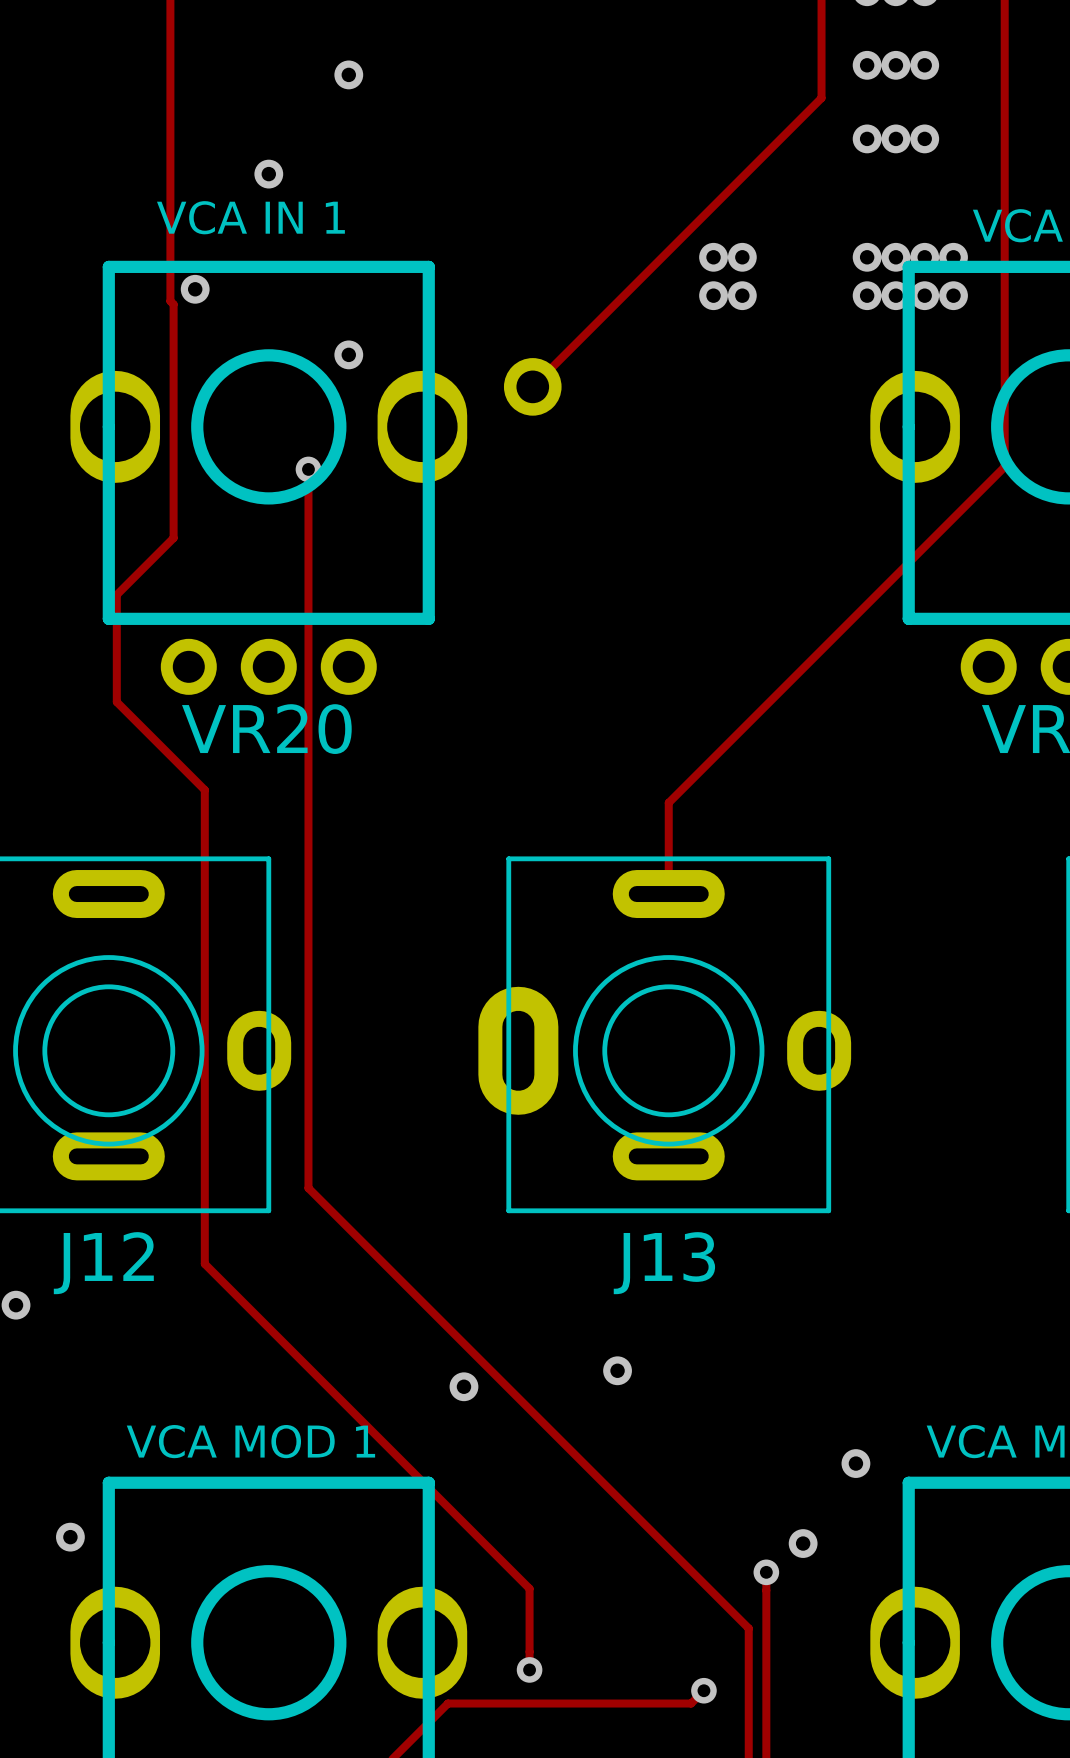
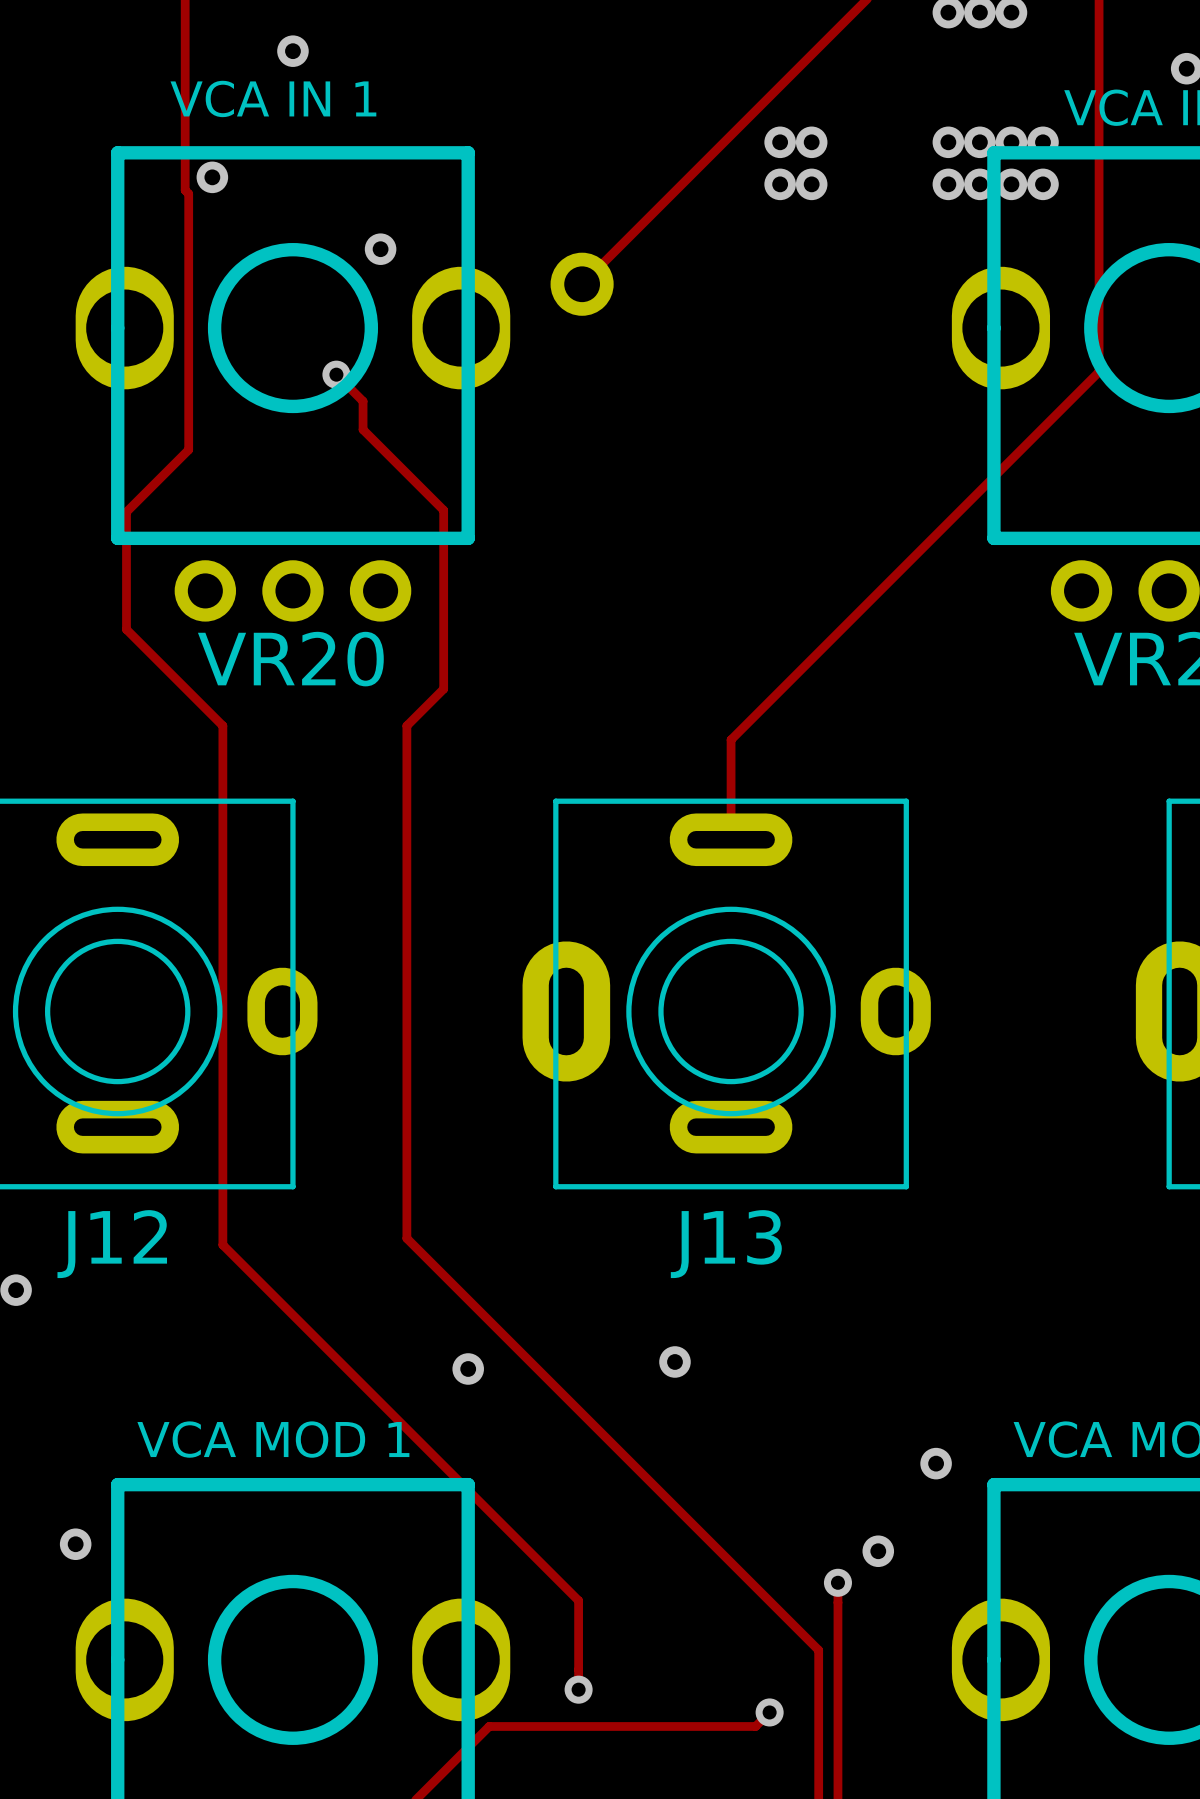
track: (308, 469) (308, 1188) (748, 1628) (748, 1633) -> (336, 374) (363, 401) (363, 429) (443, 510) (443, 689) (406, 725) (406, 1238) (818, 1650)
via position: (463, 1386) -> (468, 1368)

